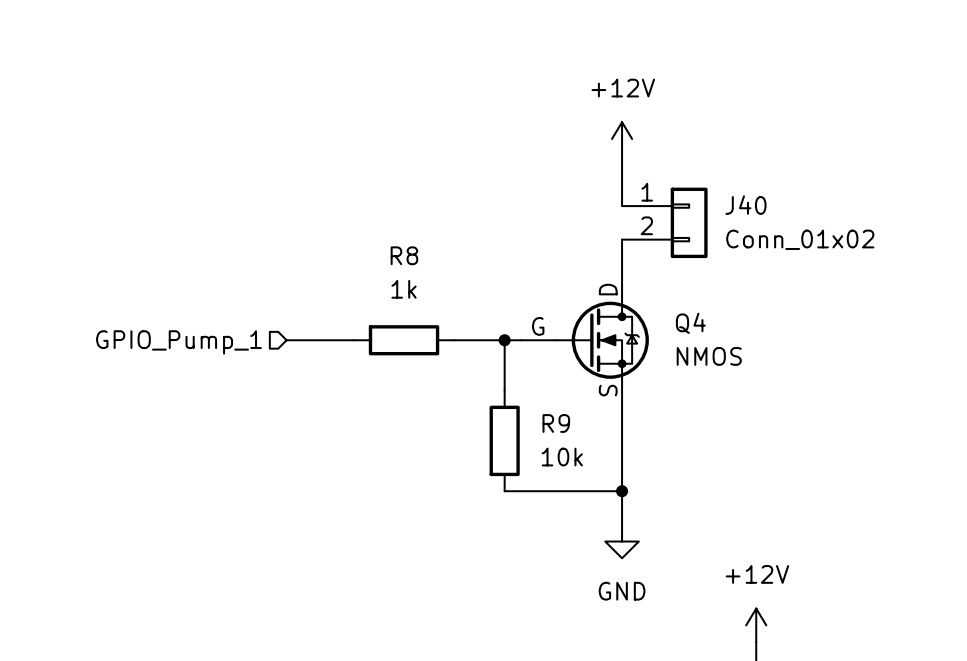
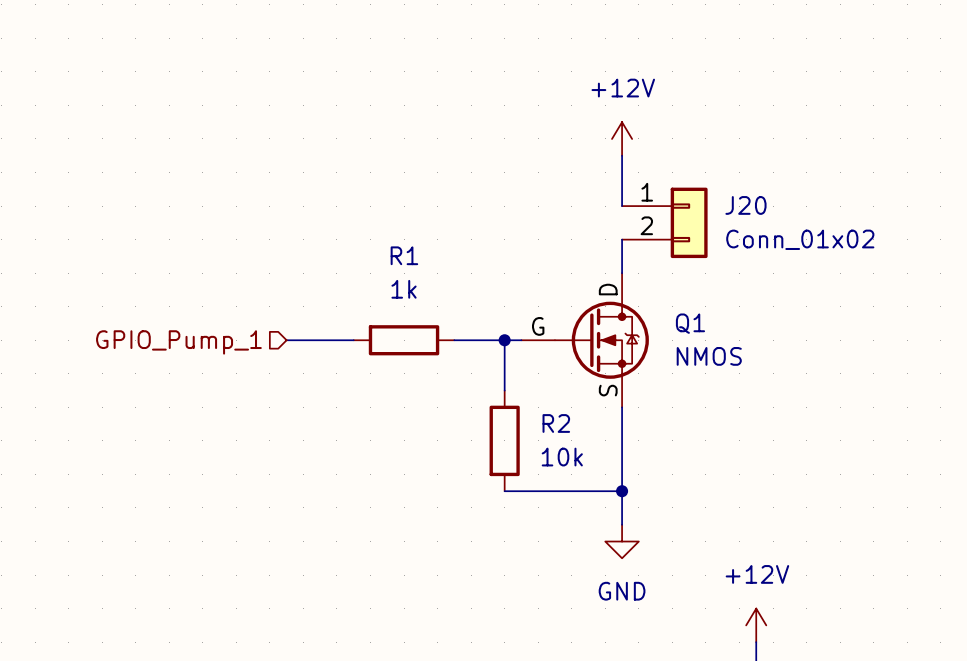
J40 name: J40 (745, 205) -> J20 (745, 205)
R8 name: R8 (404, 255) -> R1 (404, 255)
Q4 name: Q4 (690, 323) -> Q1 (690, 323)
R9 name: R9 (556, 423) -> R2 (556, 423)

